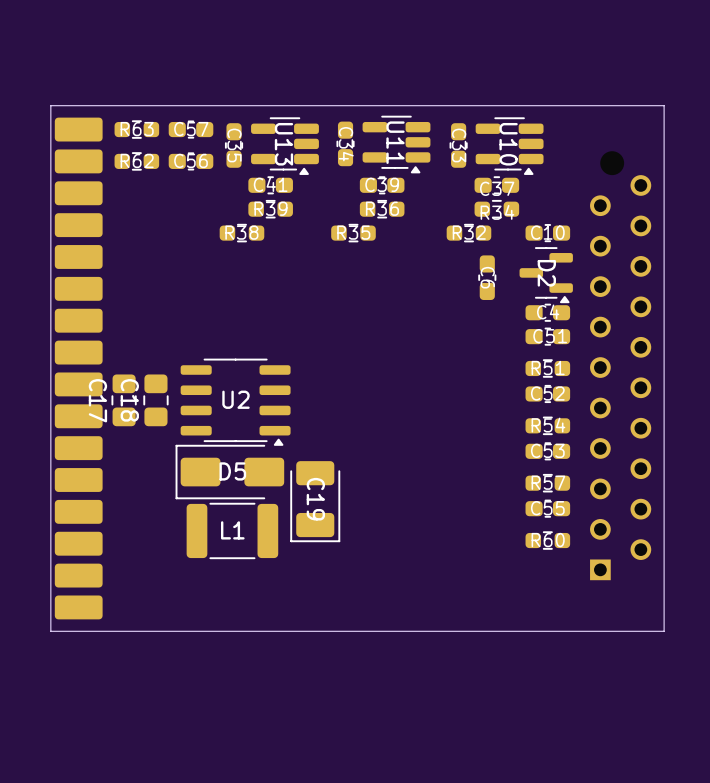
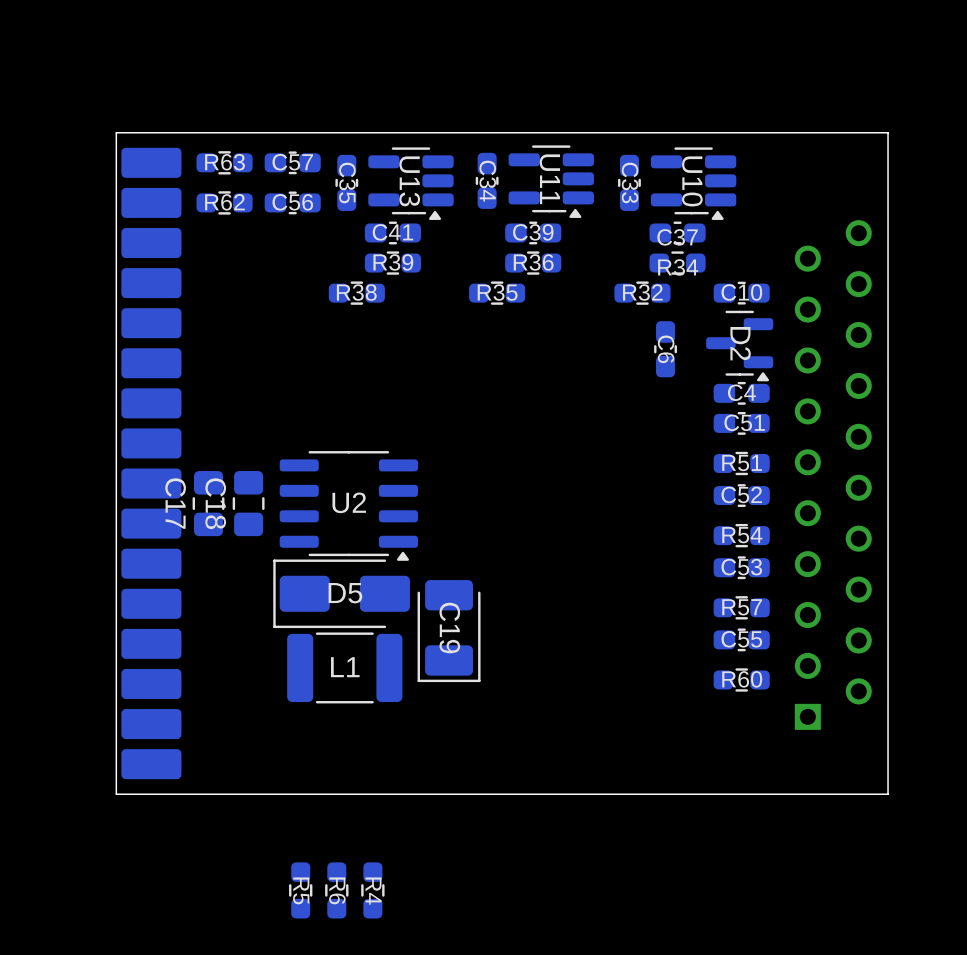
R5: none -> (300, 890)
R6: none -> (336, 890)
R4: none -> (372, 890)

